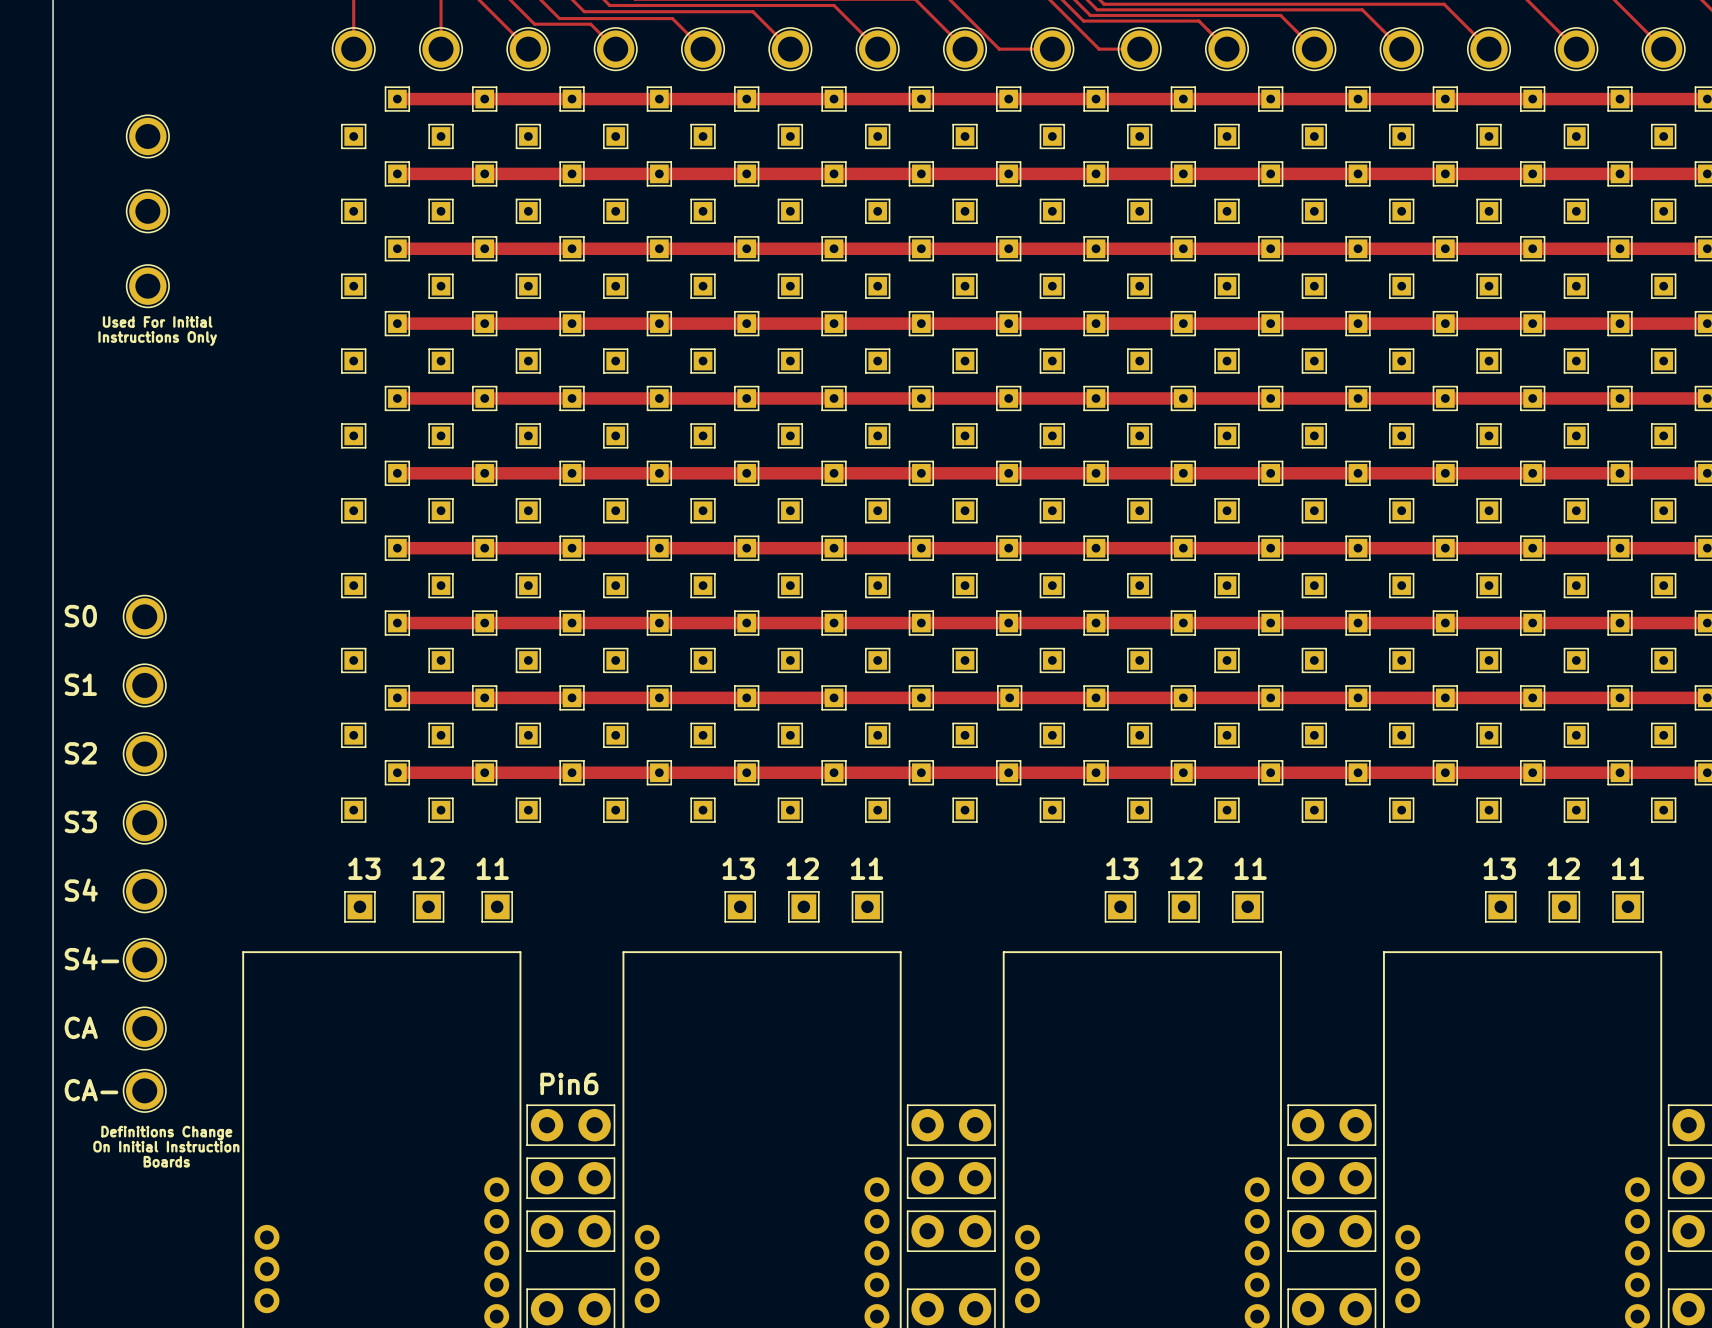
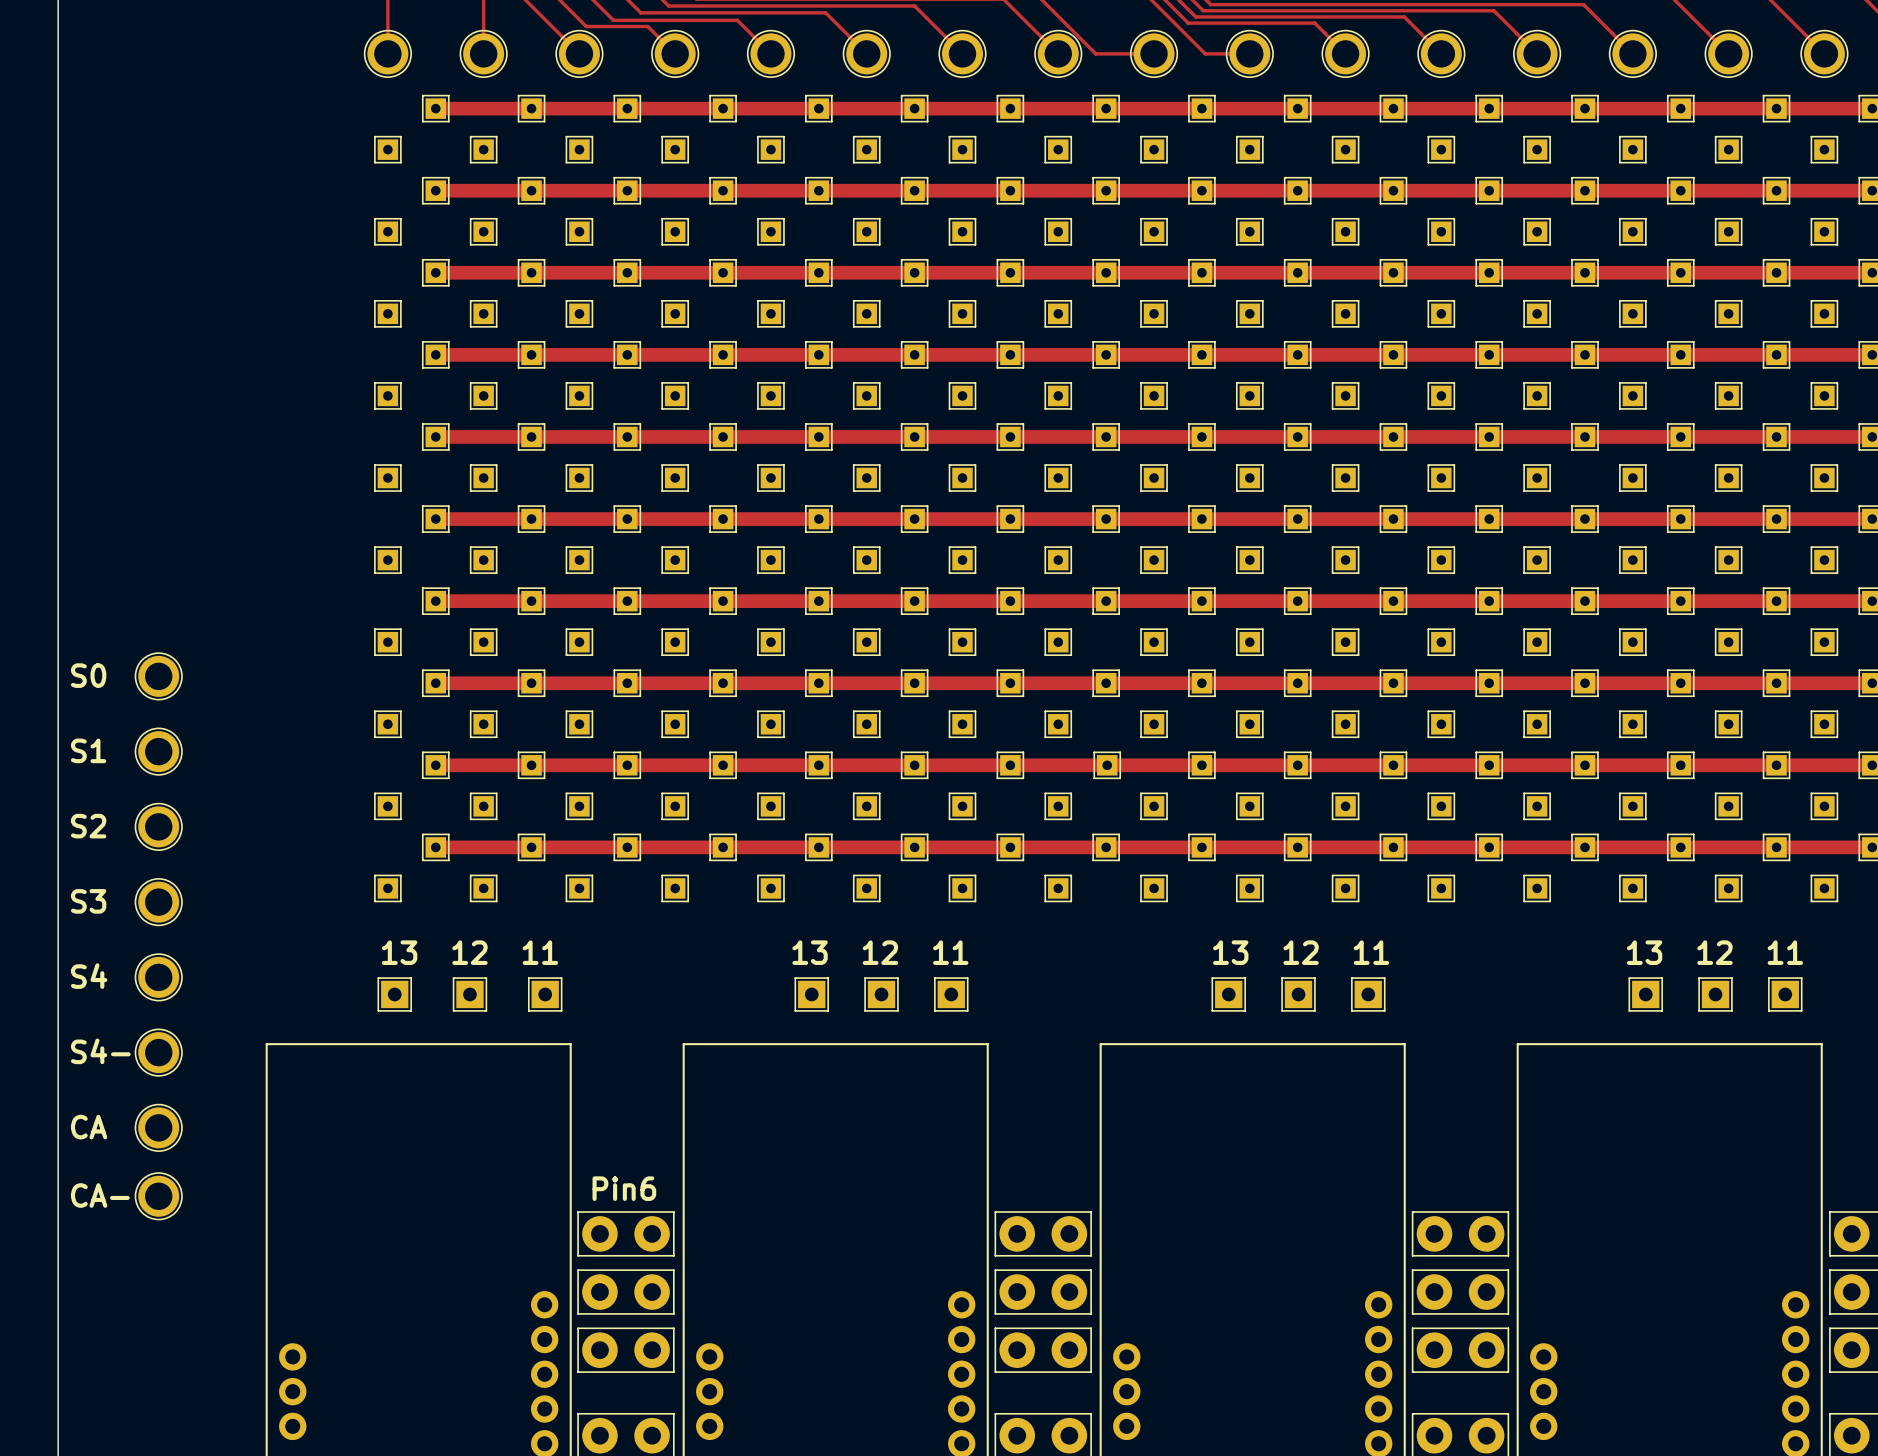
part: (147, 136) -> none
part: (147, 211) -> none
part: (147, 286) -> none
text: Used For Initial (157, 321) -> none
text: Instructions Only (157, 338) -> none
text: Definitions Change (166, 1133) -> none
text: On Initial Instruction (166, 1146) -> none
text: Boards (166, 1161) -> none

